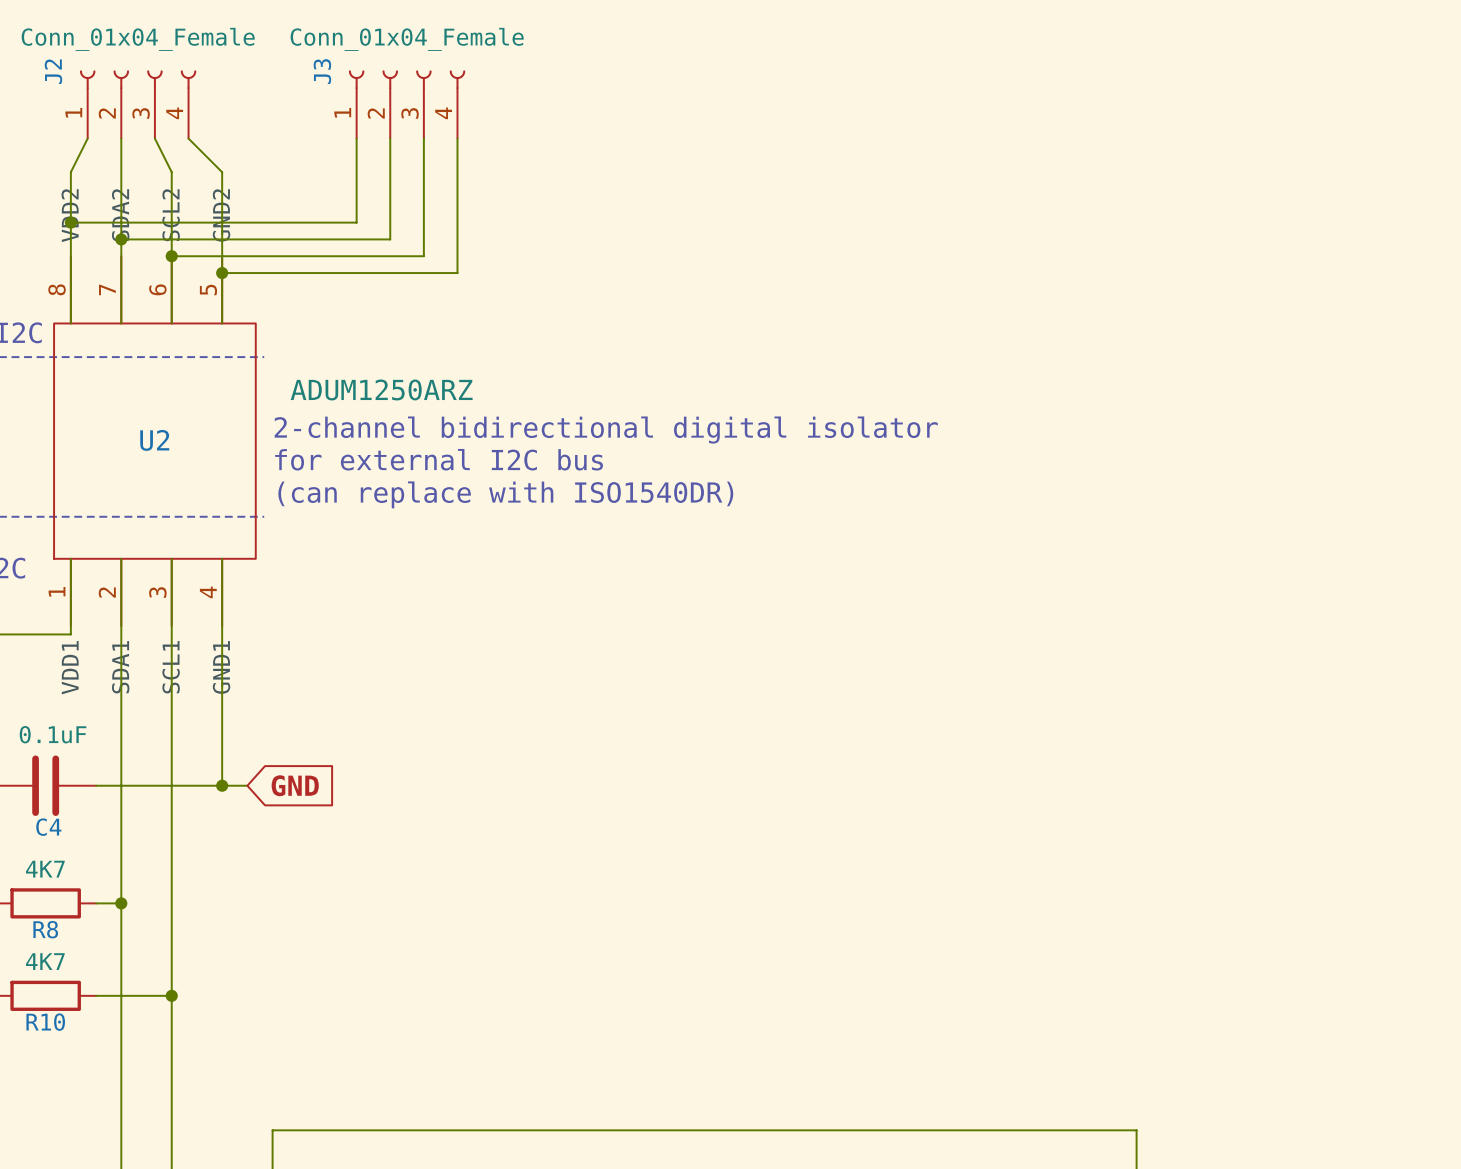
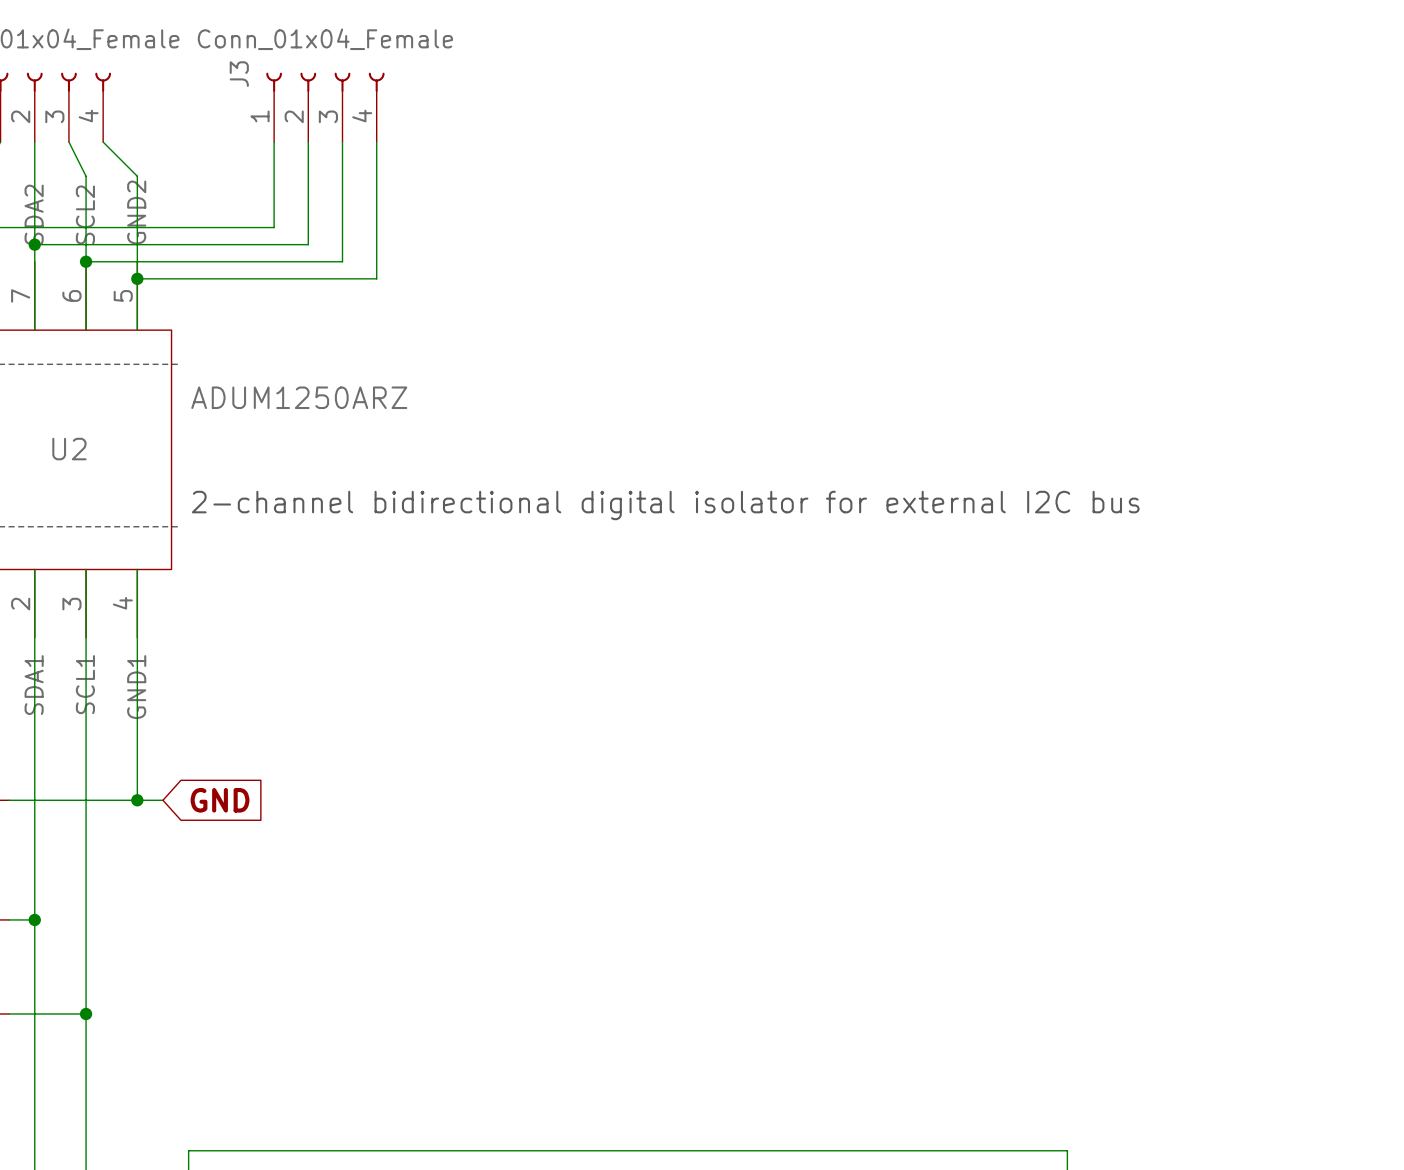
text: 2-channel bidirectional digital isolator (606, 430) -> none
text: for external I2C bus (439, 459) -> none
text: (can replace with ISO1540DR) (505, 494) -> 2-channel bidirectional digital isolator for external I2C bus (665, 505)

